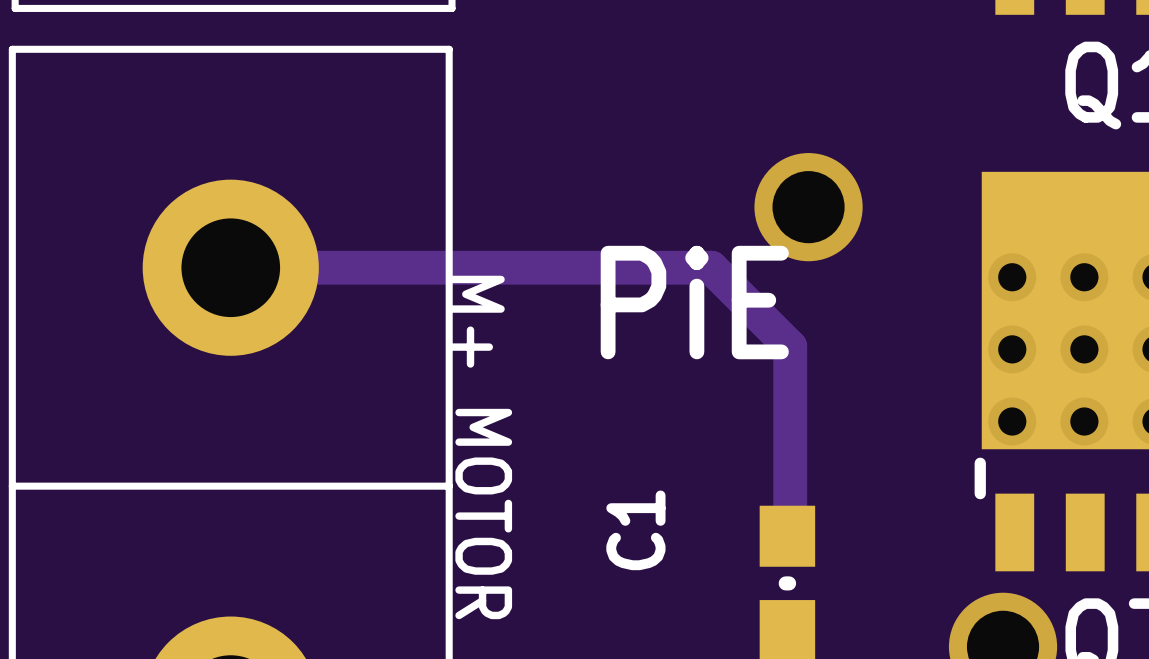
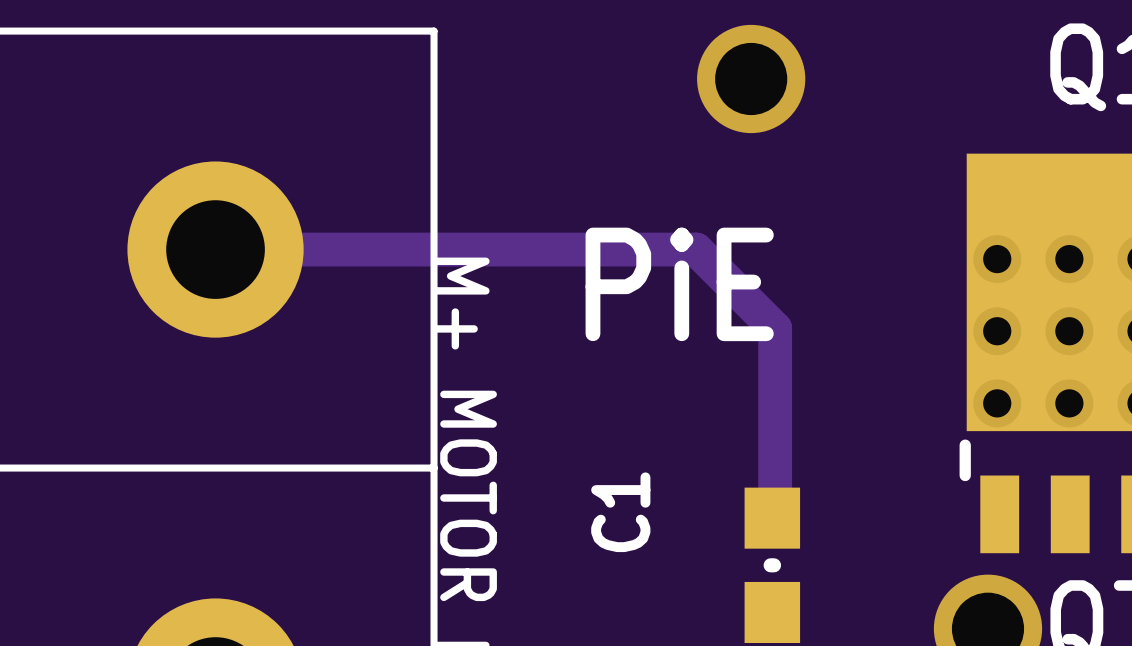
via position: (808, 207) -> (751, 79)

